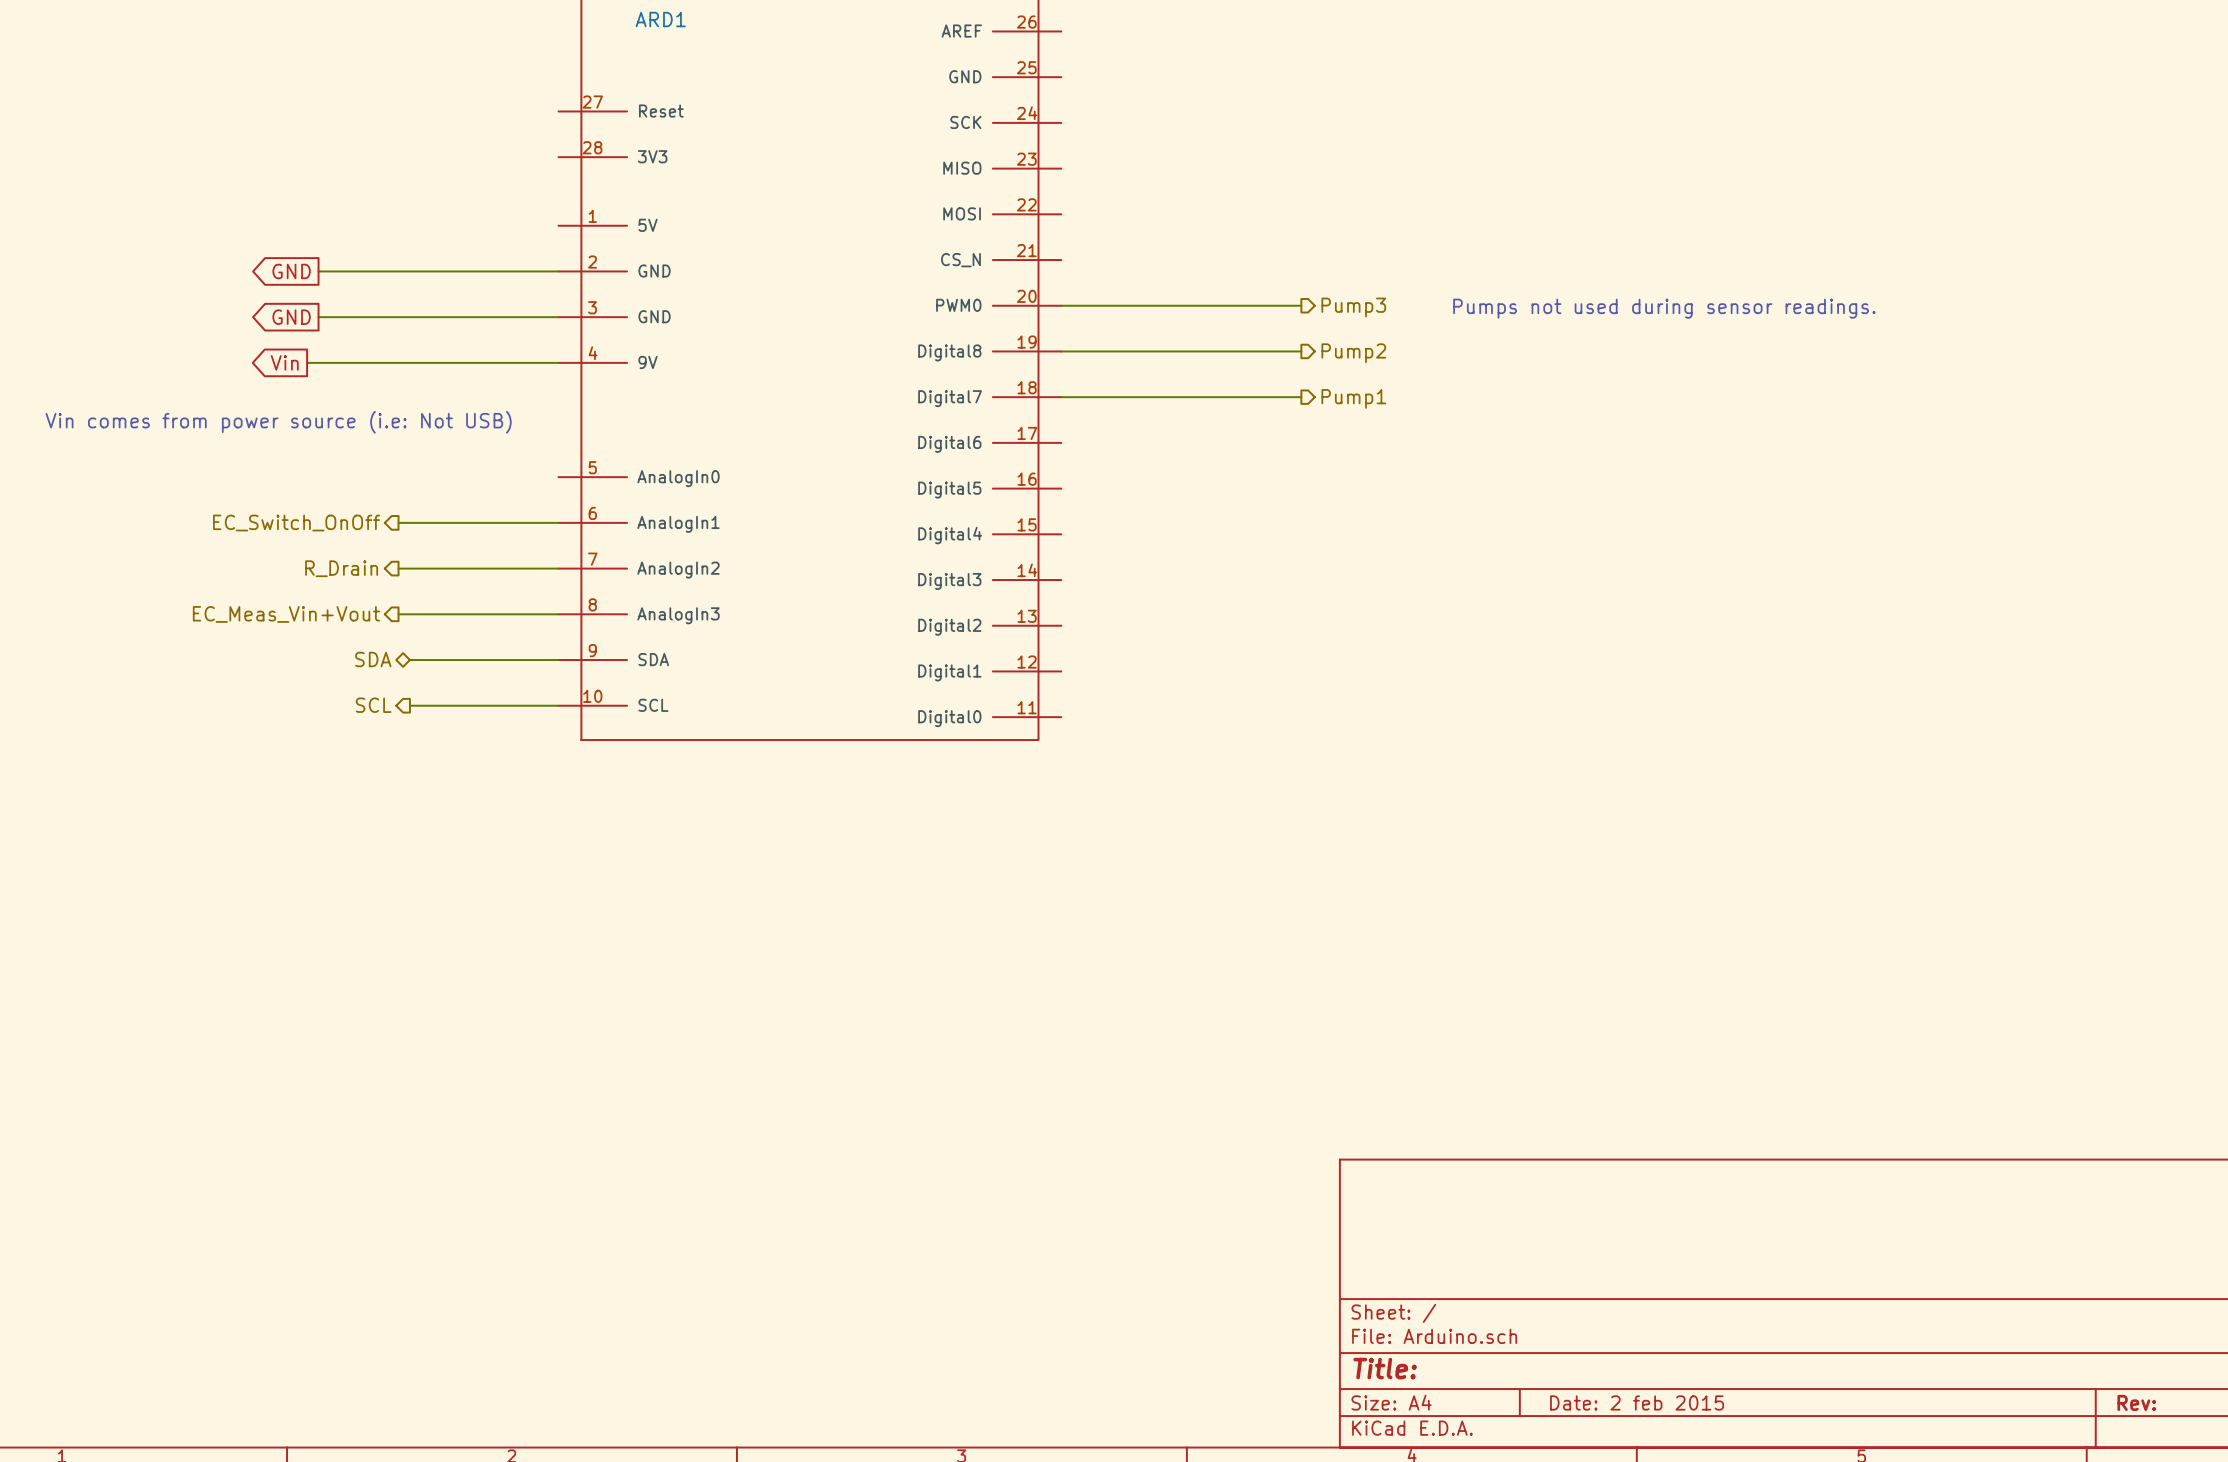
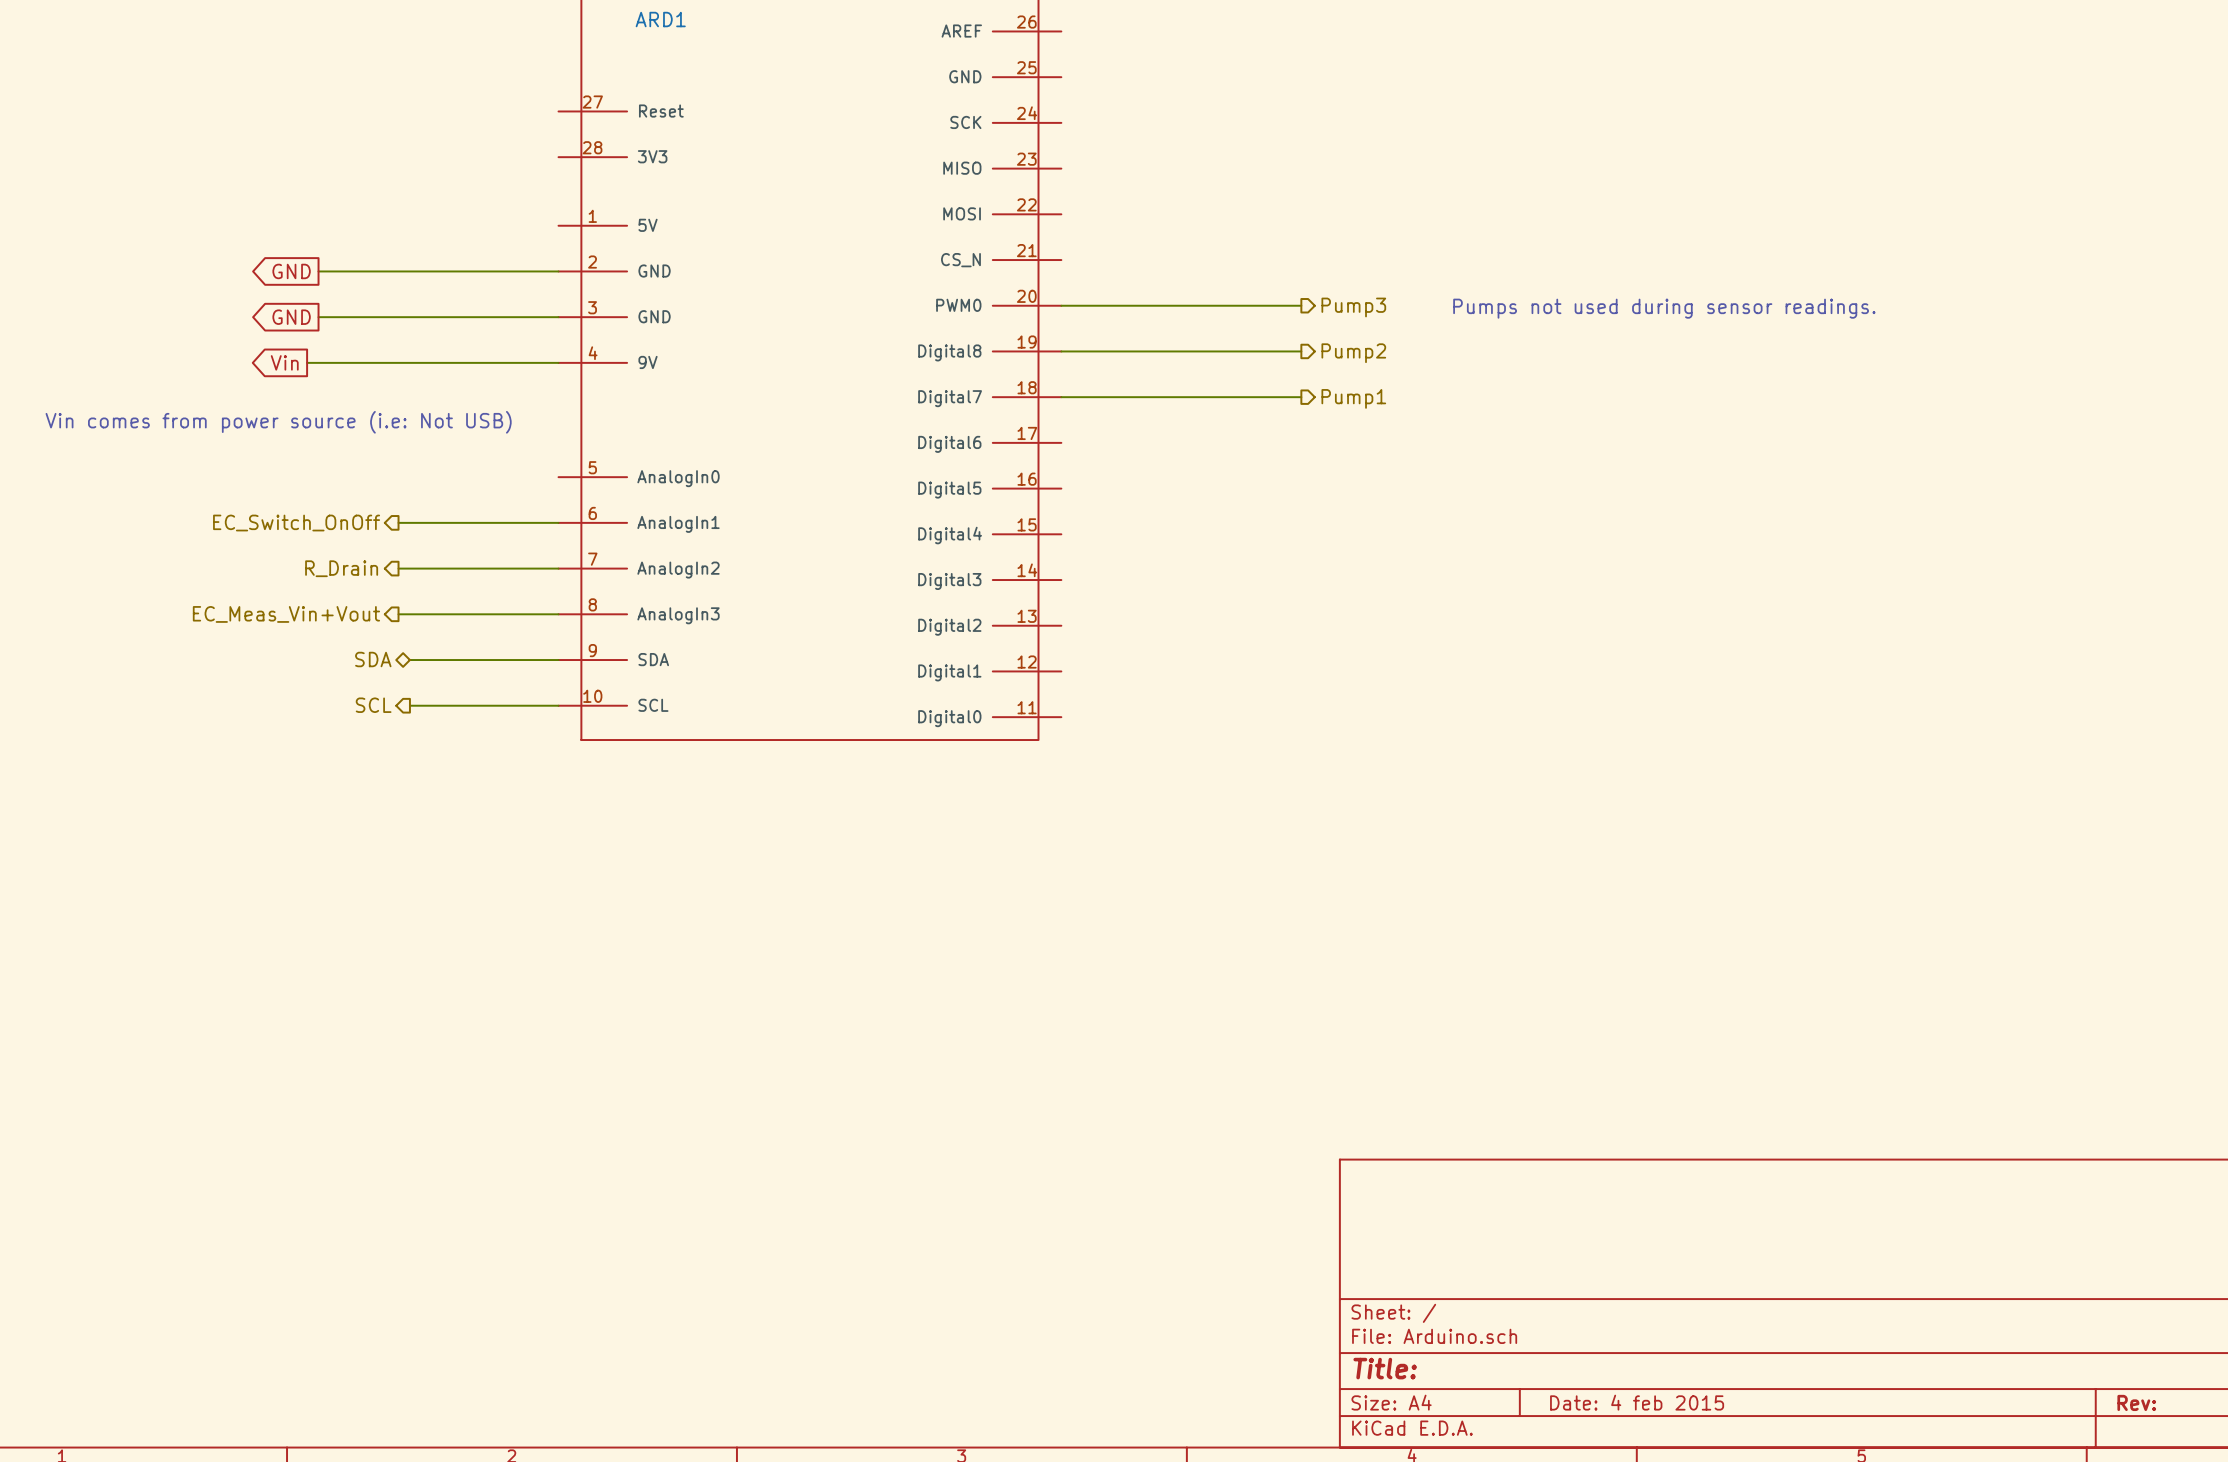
title block: Date: 2 feb 2015 (1637, 1402) -> Date: 4 feb 2015 (1637, 1402)

